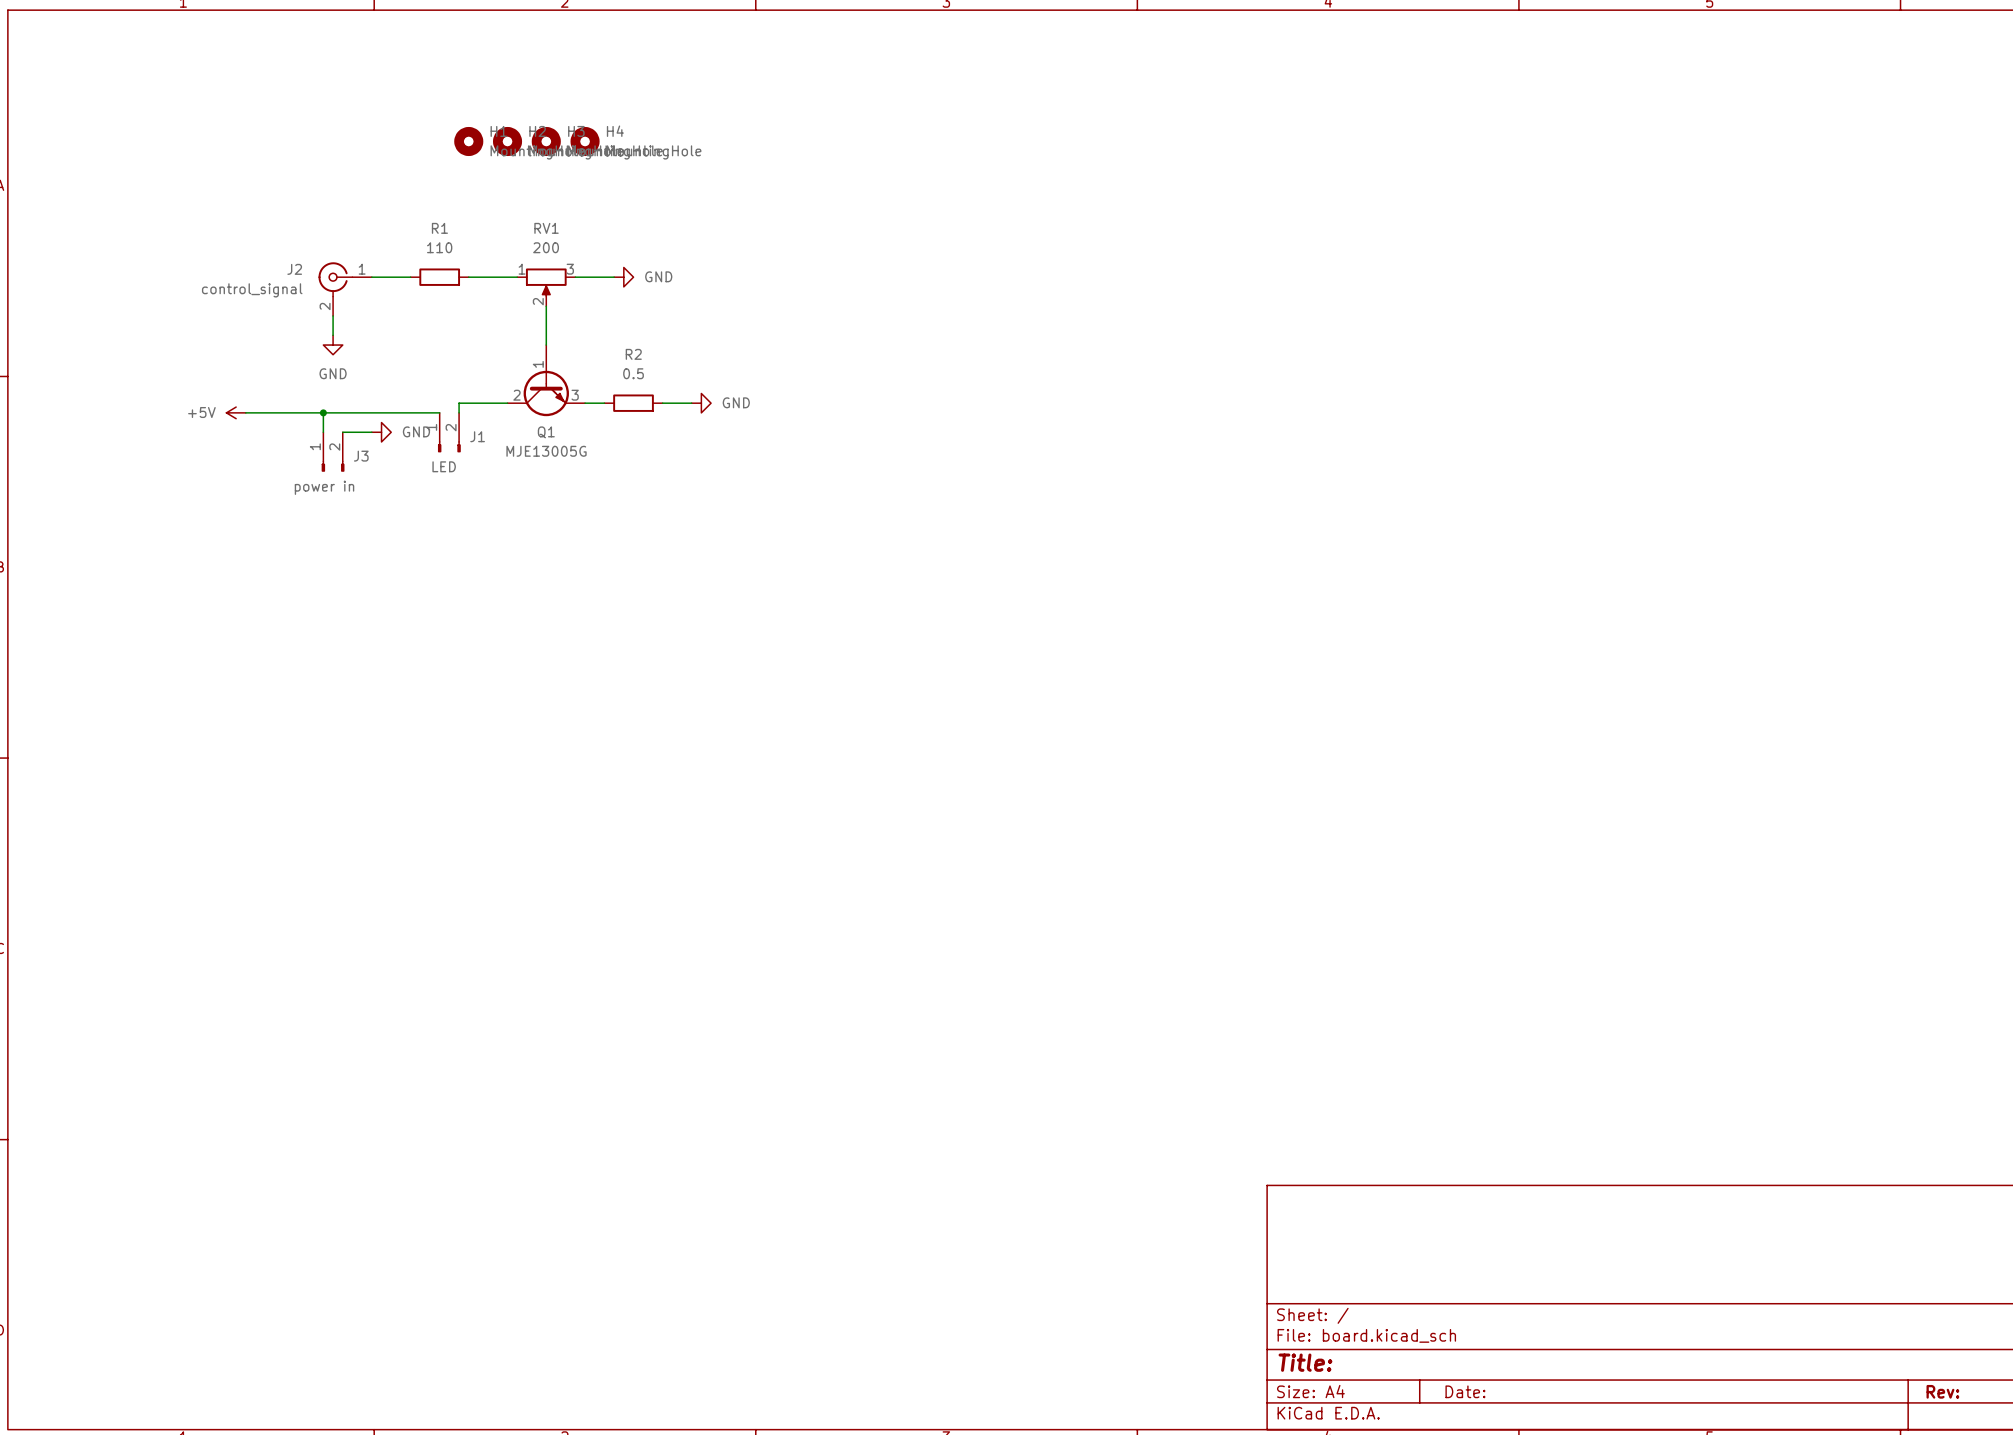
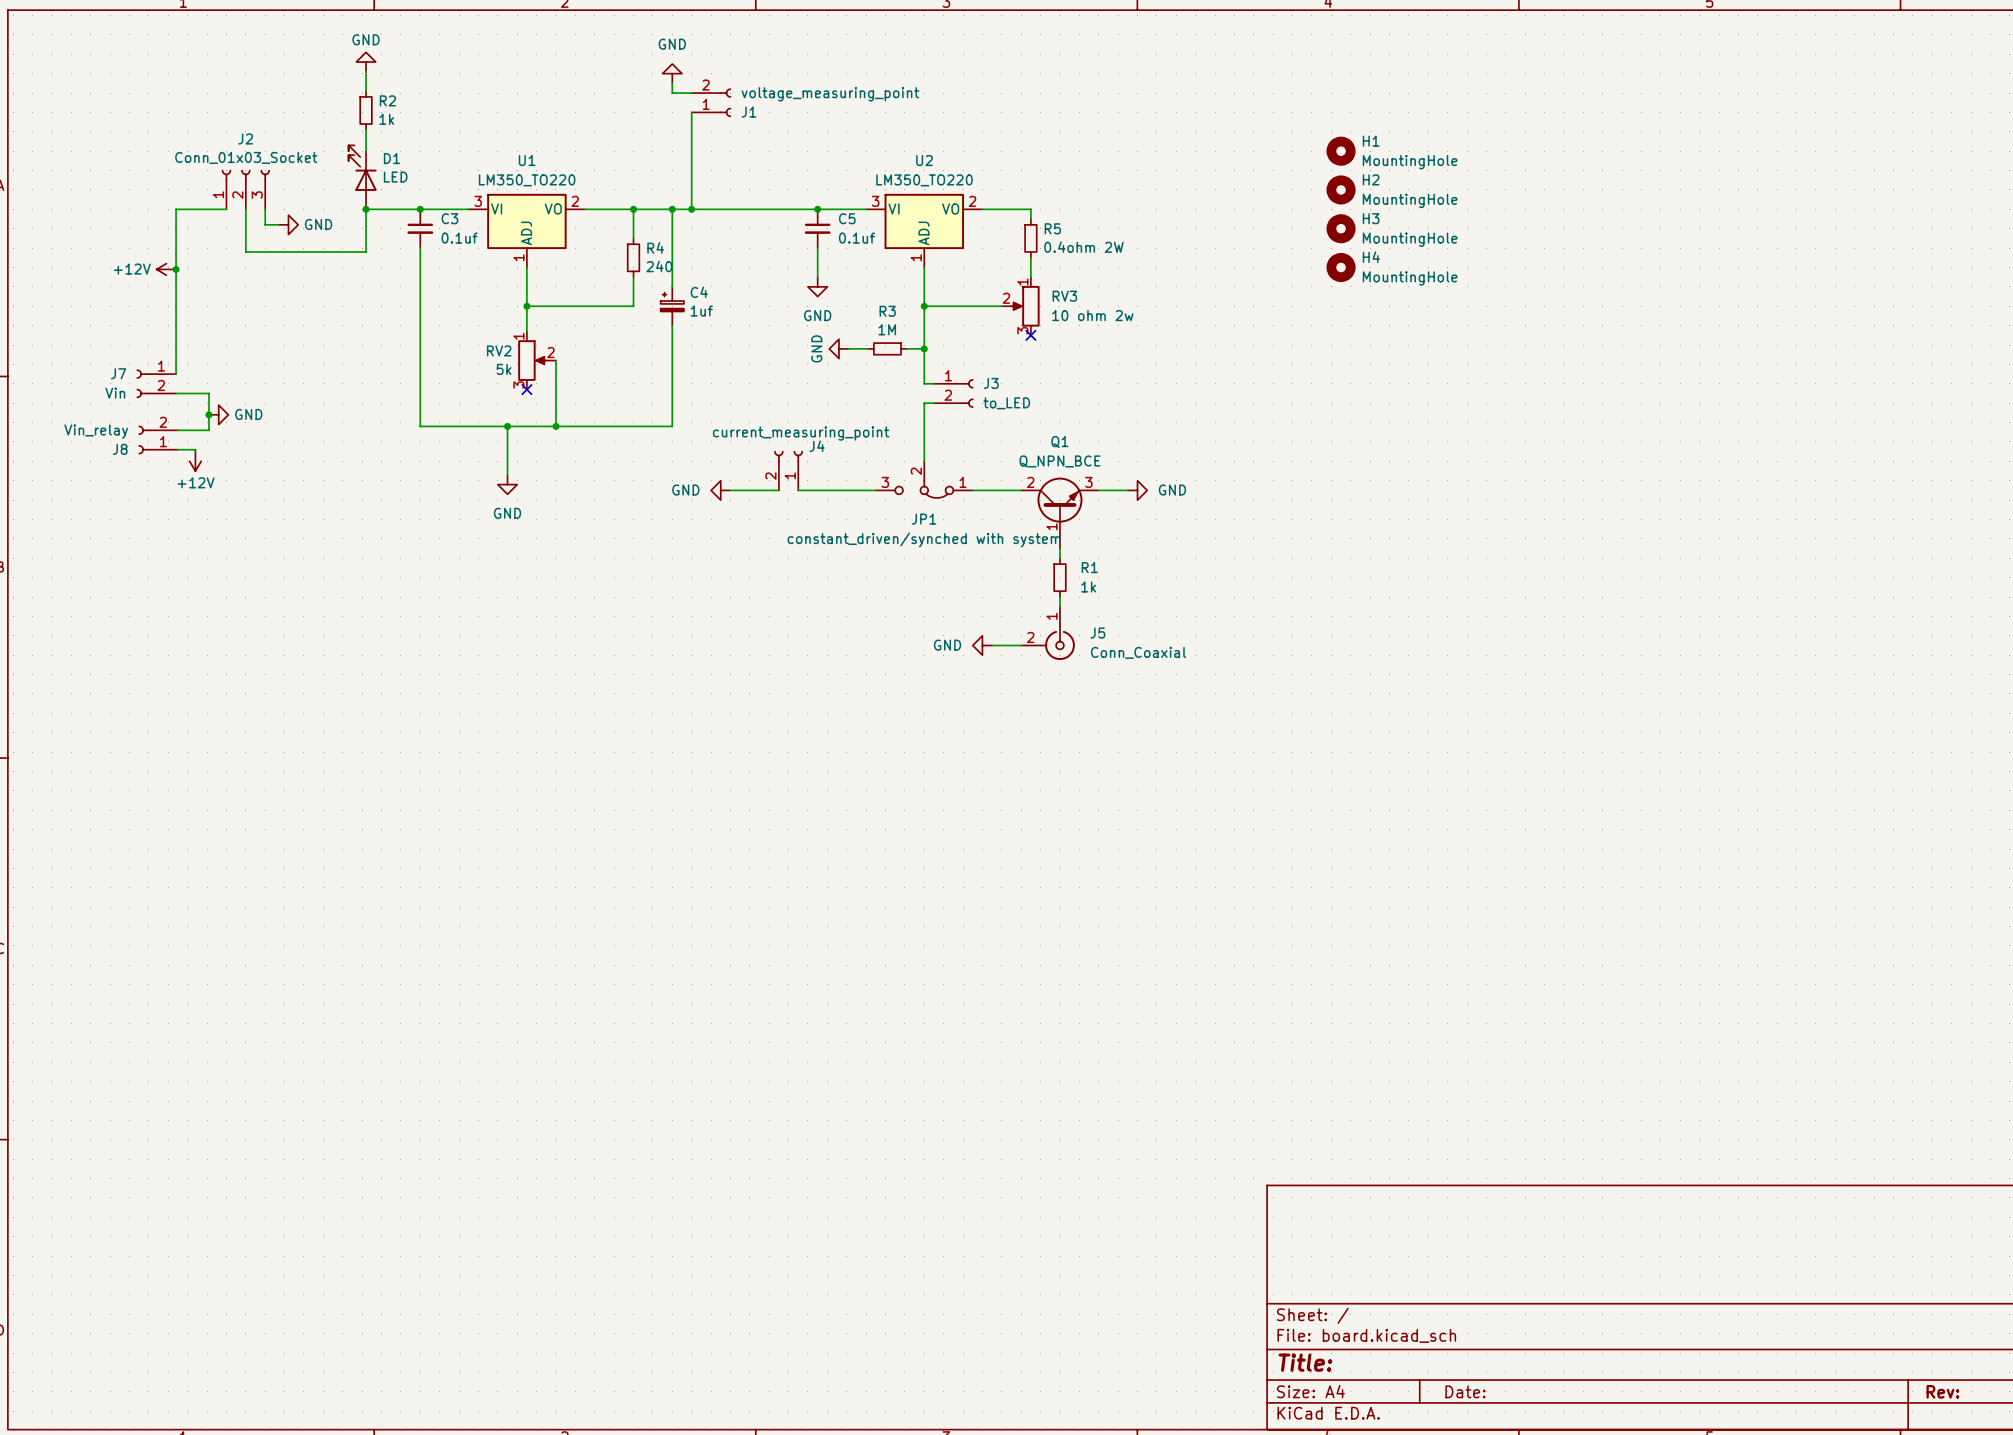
power symbol: none -> GND (366, 62)
wire: none -> (366, 71) (366, 91)
power symbol: none -> GND (672, 73)
wire: none -> (672, 83) (672, 93) (691, 93)
wire: none -> (691, 112) (691, 209)
wire: none -> (366, 129) (366, 151)
H1 position: (468, 141) -> (1341, 151)
H2 position: (507, 141) -> (1341, 189)
H3 position: (546, 141) -> (1341, 228)
H4 position: (585, 141) -> (1341, 267)
D1: none -> LED (362, 177)
wire: none -> (226, 209) (176, 209) (176, 374)
wire: none -> (245, 209) (245, 251) (366, 251) (366, 209) (468, 209)
wire: none -> (265, 209) (265, 224) (278, 224)
junction: none -> (366, 209)
junction: none -> (420, 209)
wire: none -> (585, 209) (866, 209)
wire: none -> (633, 209) (633, 238)
junction: none -> (633, 209)
wire: none -> (672, 209) (672, 286)
junction: none -> (672, 209)
junction: none -> (691, 209)
junction: none -> (817, 209)
wire: none -> (982, 209) (1030, 209) (1030, 219)
power symbol: none -> GND (288, 224)
C3: none -> 0.1uf (420, 228)
R1 name position: R1 (439, 228) -> R1 (1089, 567)
C5: none -> 0.1uf (817, 228)
U1: none -> LM350_TO220 (526, 230)
U2: none -> LM350_TO220 (924, 230)
R5: none -> 0.4ohm 2W (1030, 238)
R1 value: 110 (439, 247) -> 1k (1088, 586)
wire: none -> (420, 248) (420, 426) (672, 426) (672, 325)
wire: none -> (817, 248) (817, 277)
R4: none -> 240 (633, 257)
wire: none -> (1030, 257) (1030, 277)
J2 symbol: [318, 262, 372, 316] -> [221, 169, 270, 210]
wire: none -> (526, 267) (526, 331)
wire: none -> (924, 267) (924, 383) (933, 383)
R1 symbol: [410, 268, 469, 286] -> [1053, 558, 1067, 598]
power symbol: none -> +12V (166, 269)
junction: none -> (176, 269)
J2 name position: J2 (294, 269) -> J2 (245, 138)
wire: (371, 277) (410, 277) -> none
wire: (468, 277) (517, 277) -> none
wire: (575, 277) (614, 277) -> none
power symbol: GND (623, 277) -> none
wire: none -> (633, 277) (633, 306) (526, 306)
power symbol: none -> GND (817, 286)
RV1: 200 (546, 287) -> none
J2 value: control_signal (252, 290) -> Conn_01x03_Socket (246, 157)
junction: none -> (526, 306)
wire: (546, 306) (546, 345) -> none
C4: none -> 1uf (672, 306)
wire: none -> (924, 306) (1001, 306)
junction: none -> (924, 306)
RV3: none -> 10 ohm 2w (1020, 306)
wire: (333, 315) (333, 335) -> none
no-connect mark: none -> (1030, 335)
power symbol: GND (333, 345) -> none
Q1 symbol: [507, 345, 586, 417] -> [1021, 477, 1099, 549]
power symbol: none -> GND (838, 348)
wire: none -> (848, 348) (868, 348)
R3: none -> 1M (887, 348)
wire: none -> (906, 348) (924, 348)
junction: none -> (924, 348)
R2 name position: R2 (633, 354) -> R2 (387, 100)
RV2: none -> 5k (537, 360)
wire: none -> (555, 360) (555, 426)
R2 value: 0.5 (633, 373) -> 1k (386, 119)
J7: none -> Vin (156, 383)
no-connect mark: none -> (526, 389)
wire: none -> (176, 393) (209, 393) (209, 430) (177, 430)
R2 symbol: [604, 394, 663, 412] -> [359, 91, 373, 130]
wire: (507, 403) (459, 403) (459, 412) -> none
wire: (585, 403) (604, 403) -> none
wire: (662, 403) (691, 403) -> none
power symbol: GND (701, 403) -> none
wire: none -> (933, 403) (924, 403) (924, 461)
power symbol: +5V (236, 412) -> none
wire: (245, 412) (439, 412) -> none
wire: (323, 412) (323, 432) -> none
junction: (323, 412) -> none
J1 symbol: [438, 412, 461, 453] -> [691, 88, 732, 117]
junction: none -> (209, 414)
power symbol: none -> GND (218, 414)
wire: none -> (507, 426) (507, 474)
junction: none -> (507, 426)
junction: none -> (555, 426)
J3 symbol: [321, 432, 345, 472] -> [933, 379, 974, 408]
wire: (342, 432) (371, 432) -> none
power symbol: GND (381, 432) -> none
Q1 name position: Q1 (546, 432) -> Q1 (1059, 442)
J8: none -> Vin_relay (158, 440)
wire: none -> (177, 449) (195, 449) (195, 451)
Q1 value: MJE13005G (546, 451) -> Q_NPN_BCE (1059, 461)
J3 name position: J3 (361, 456) -> J3 (991, 383)
power symbol: none -> +12V (195, 461)
J1 value: LED (444, 466) -> voltage_measuring_point (830, 94)
J4: none -> current_measuring_point (788, 470)
JP1: none -> constant_driven/synched with system (924, 479)
power symbol: none -> GND (507, 484)
J3 value: power in (324, 487) -> to_LED (1006, 403)
power symbol: none -> GND (720, 490)
wire: none -> (730, 490) (778, 490)
wire: none -> (798, 490) (875, 490)
wire: none -> (972, 490) (1021, 490)
wire: none -> (1098, 490) (1127, 490)
power symbol: none -> GND (1137, 490)
wire: none -> (1059, 548) (1059, 558)
wire: none -> (1059, 597) (1059, 606)
J5: none -> Conn_Coaxial (1048, 633)
power symbol: none -> GND (982, 645)
wire: none -> (992, 645) (1021, 645)

